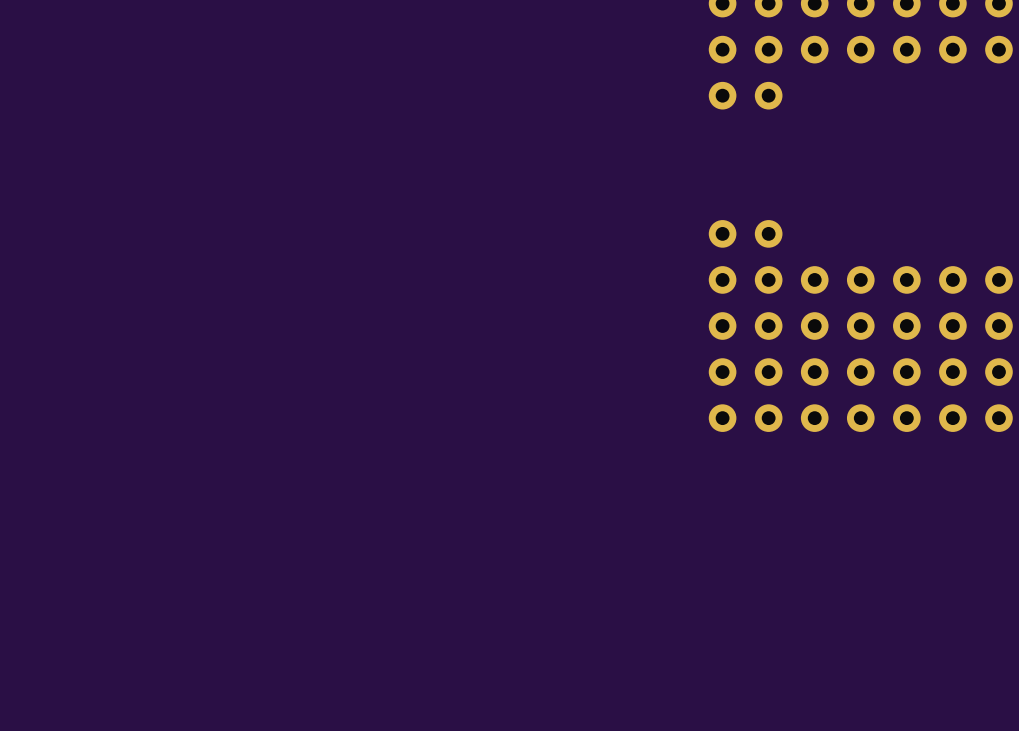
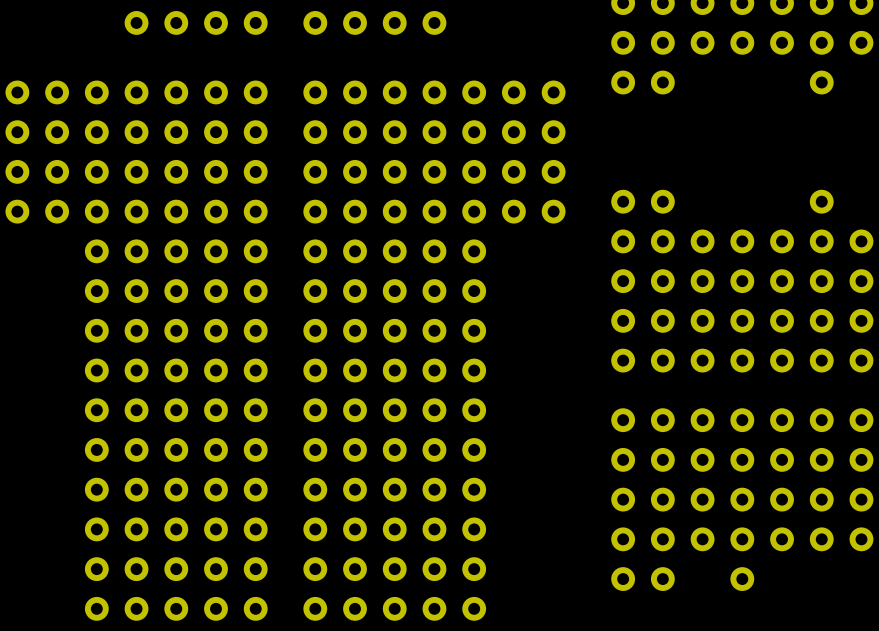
part: none -> (136, 22)
part: none -> (176, 22)
part: none -> (215, 22)
part: none -> (255, 22)
part: none -> (315, 22)
part: none -> (355, 22)
part: none -> (394, 22)
part: none -> (434, 22)
part: none -> (821, 82)
part: none -> (17, 92)
part: none -> (57, 92)
part: none -> (96, 92)
part: none -> (136, 92)
part: none -> (176, 92)
part: none -> (215, 92)
part: none -> (255, 92)
part: none -> (315, 92)
part: none -> (355, 92)
part: none -> (394, 92)
part: none -> (434, 92)
part: none -> (474, 92)
part: none -> (513, 92)
part: none -> (553, 92)
part: none -> (17, 132)
part: none -> (57, 132)
part: none -> (96, 132)
part: none -> (136, 132)
part: none -> (176, 132)
part: none -> (215, 132)
part: none -> (255, 132)
part: none -> (315, 132)
part: none -> (355, 132)
part: none -> (394, 132)
part: none -> (434, 132)
part: none -> (474, 132)
part: none -> (513, 132)
part: none -> (553, 132)
part: none -> (17, 171)
part: none -> (57, 171)
part: none -> (96, 171)
part: none -> (136, 171)
part: none -> (176, 171)
part: none -> (215, 171)
part: none -> (255, 171)
part: none -> (315, 171)
part: none -> (355, 171)
part: none -> (394, 171)
part: none -> (434, 171)
part: none -> (474, 171)
part: none -> (513, 171)
part: none -> (553, 171)
part: none -> (821, 201)
part: none -> (17, 211)
part: none -> (57, 211)
part: none -> (96, 211)
part: none -> (136, 211)
part: none -> (176, 211)
part: none -> (215, 211)
part: none -> (255, 211)
part: none -> (315, 211)
part: none -> (355, 211)
part: none -> (394, 211)
part: none -> (434, 211)
part: none -> (474, 211)
part: none -> (513, 211)
part: none -> (553, 211)
part: none -> (96, 251)
part: none -> (136, 251)
part: none -> (176, 251)
part: none -> (215, 251)
part: none -> (255, 251)
part: none -> (315, 251)
part: none -> (355, 251)
part: none -> (394, 251)
part: none -> (434, 251)
part: none -> (474, 251)
part: none -> (96, 291)
part: none -> (136, 291)
part: none -> (176, 291)
part: none -> (215, 291)
part: none -> (255, 291)
part: none -> (315, 291)
part: none -> (355, 291)
part: none -> (394, 291)
part: none -> (434, 291)
part: none -> (474, 291)
part: none -> (96, 330)
part: none -> (136, 330)
part: none -> (176, 330)
part: none -> (215, 330)
part: none -> (255, 330)
part: none -> (315, 330)
part: none -> (355, 330)
part: none -> (394, 330)
part: none -> (434, 330)
part: none -> (474, 330)
part: none -> (96, 370)
part: none -> (136, 370)
part: none -> (176, 370)
part: none -> (215, 370)
part: none -> (255, 370)
part: none -> (315, 370)
part: none -> (355, 370)
part: none -> (394, 370)
part: none -> (434, 370)
part: none -> (474, 370)
part: none -> (96, 410)
part: none -> (136, 410)
part: none -> (176, 410)
part: none -> (215, 410)
part: none -> (255, 410)
part: none -> (315, 410)
part: none -> (355, 410)
part: none -> (394, 410)
part: none -> (434, 410)
part: none -> (474, 410)
part: none -> (623, 420)
part: none -> (662, 420)
part: none -> (702, 420)
part: none -> (742, 420)
part: none -> (782, 420)
part: none -> (821, 420)
part: none -> (861, 420)
part: none -> (96, 449)
part: none -> (136, 449)
part: none -> (176, 449)
part: none -> (215, 449)
part: none -> (255, 449)
part: none -> (315, 449)
part: none -> (355, 449)
part: none -> (394, 449)
part: none -> (434, 449)
part: none -> (474, 449)
part: none -> (623, 459)
part: none -> (662, 459)
part: none -> (702, 459)
part: none -> (742, 459)
part: none -> (782, 459)
part: none -> (821, 459)
part: none -> (861, 459)
part: none -> (96, 489)
part: none -> (136, 489)
part: none -> (176, 489)
part: none -> (215, 489)
part: none -> (255, 489)
part: none -> (315, 489)
part: none -> (355, 489)
part: none -> (394, 489)
part: none -> (434, 489)
part: none -> (474, 489)
part: none -> (623, 499)
part: none -> (662, 499)
part: none -> (702, 499)
part: none -> (742, 499)
part: none -> (782, 499)
part: none -> (821, 499)
part: none -> (861, 499)
part: none -> (96, 529)
part: none -> (136, 529)
part: none -> (176, 529)
part: none -> (215, 529)
part: none -> (255, 529)
part: none -> (315, 529)
part: none -> (355, 529)
part: none -> (394, 529)
part: none -> (434, 529)
part: none -> (474, 529)
part: none -> (623, 539)
part: none -> (662, 539)
part: none -> (702, 539)
part: none -> (742, 539)
part: none -> (782, 539)
part: none -> (821, 539)
part: none -> (861, 539)
part: none -> (96, 569)
part: none -> (136, 569)
part: none -> (176, 569)
part: none -> (215, 569)
part: none -> (255, 569)
part: none -> (315, 569)
part: none -> (355, 569)
part: none -> (394, 569)
part: none -> (434, 569)
part: none -> (474, 569)
part: none -> (623, 579)
part: none -> (662, 579)
part: none -> (742, 579)
part: none -> (96, 608)
part: none -> (136, 608)
part: none -> (176, 608)
part: none -> (215, 608)
part: none -> (255, 608)
part: none -> (315, 608)
part: none -> (355, 608)
part: none -> (394, 608)
part: none -> (434, 608)
part: none -> (474, 608)

